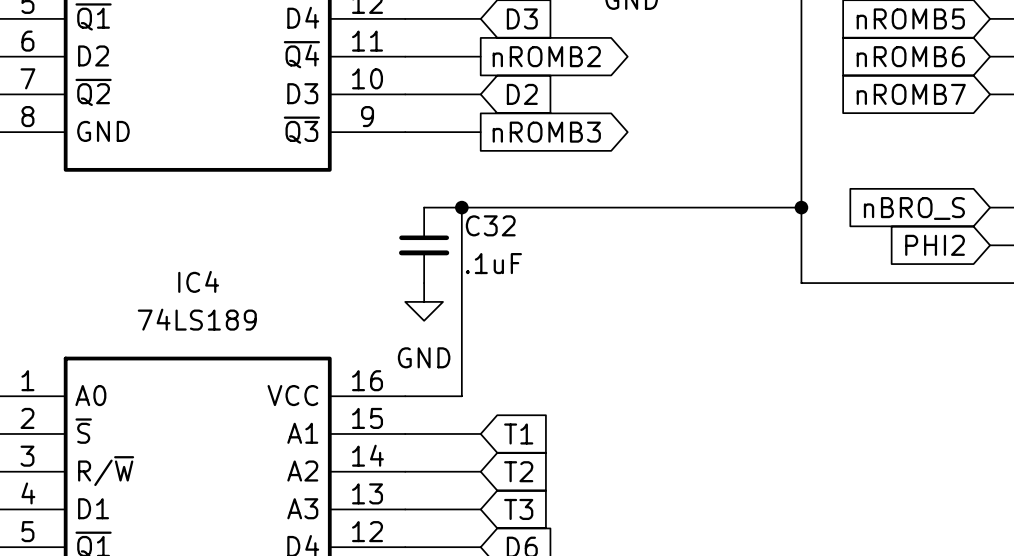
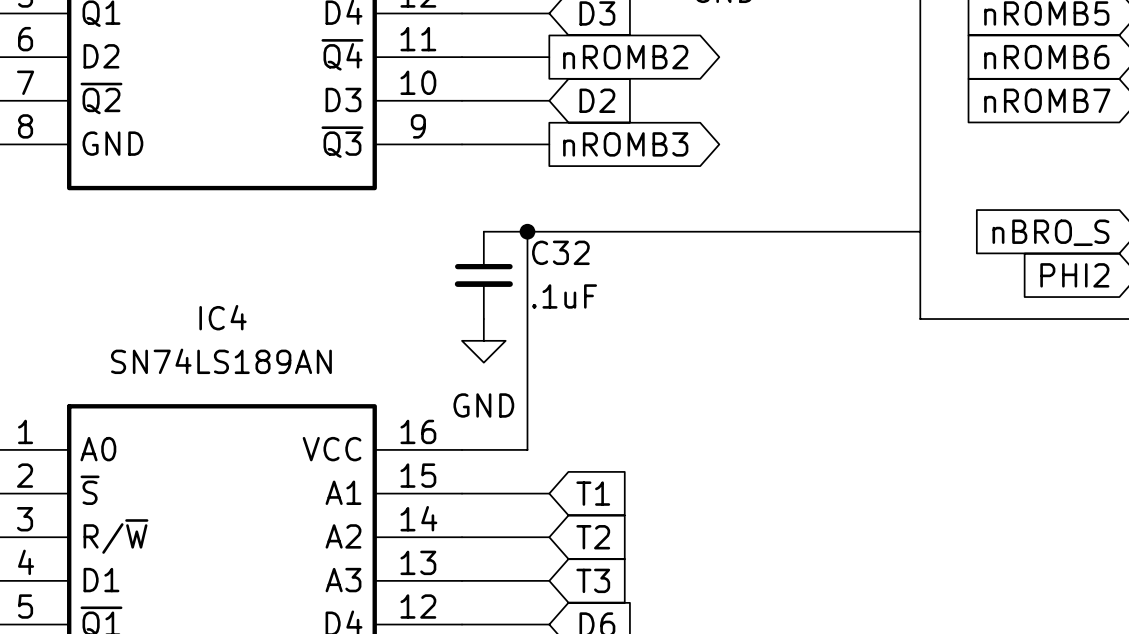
junction: (801, 207) -> none
IC4 value: 74LS189 (197, 319) -> SN74LS189AN (221, 361)

